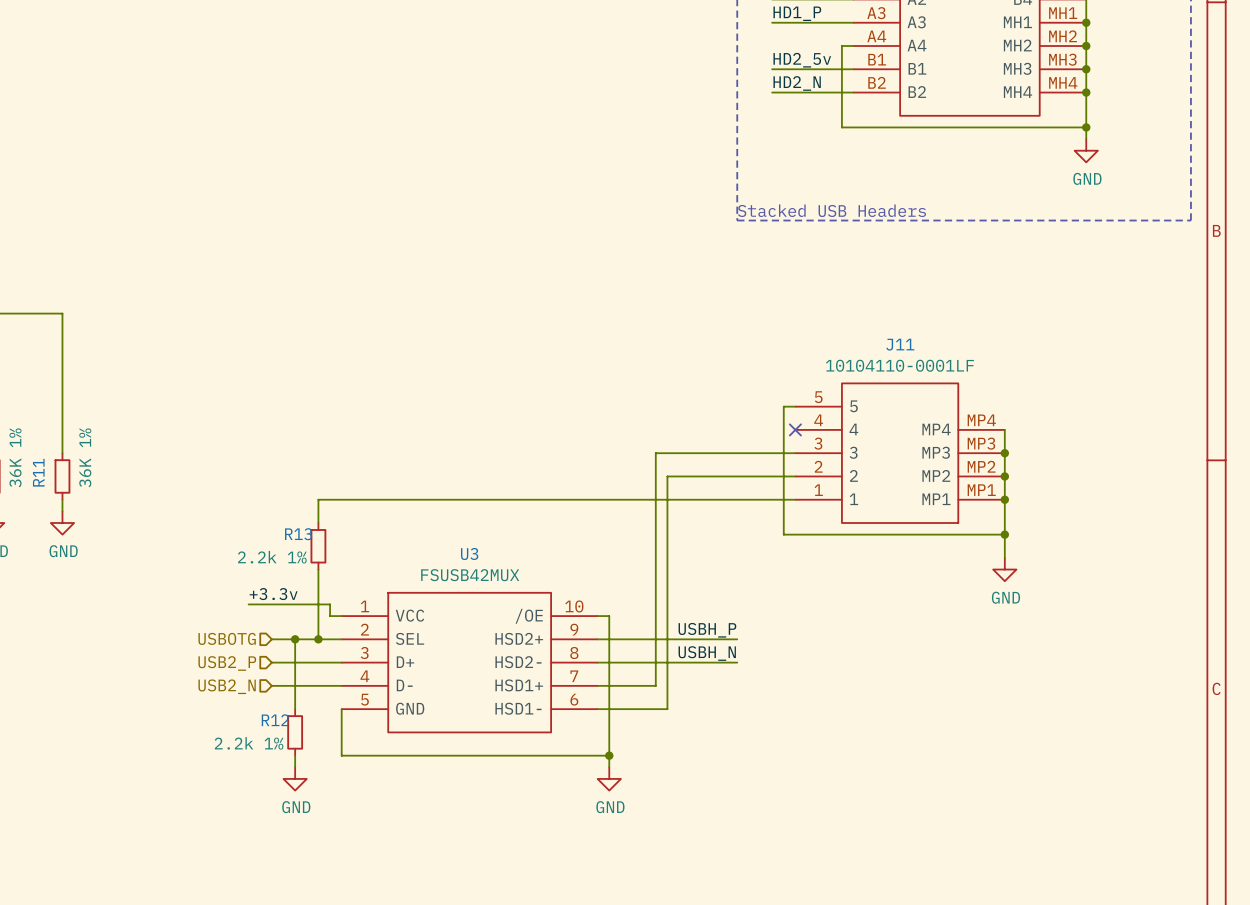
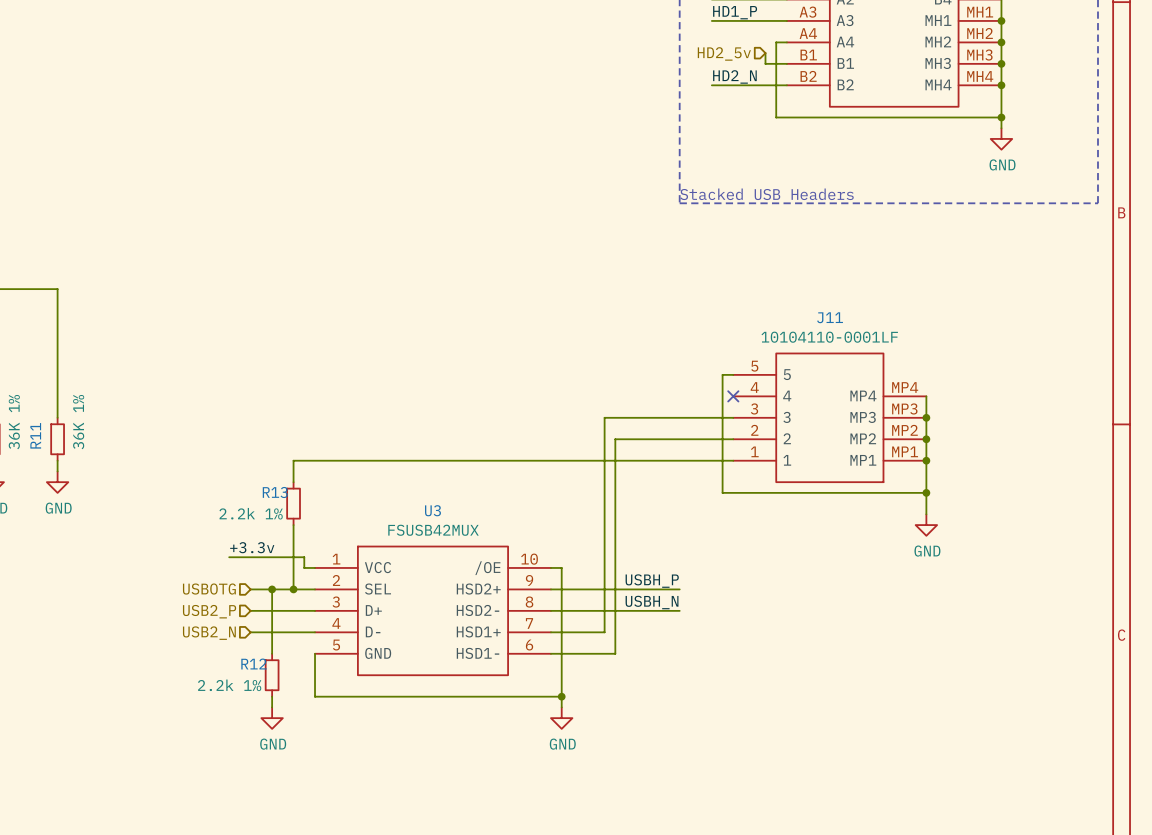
hierarchical label: none -> HD2_5v (724, 53)
label: HD2_5v (802, 60) -> none
wire: (772, 69) (830, 69) -> (765, 53) (765, 63)

